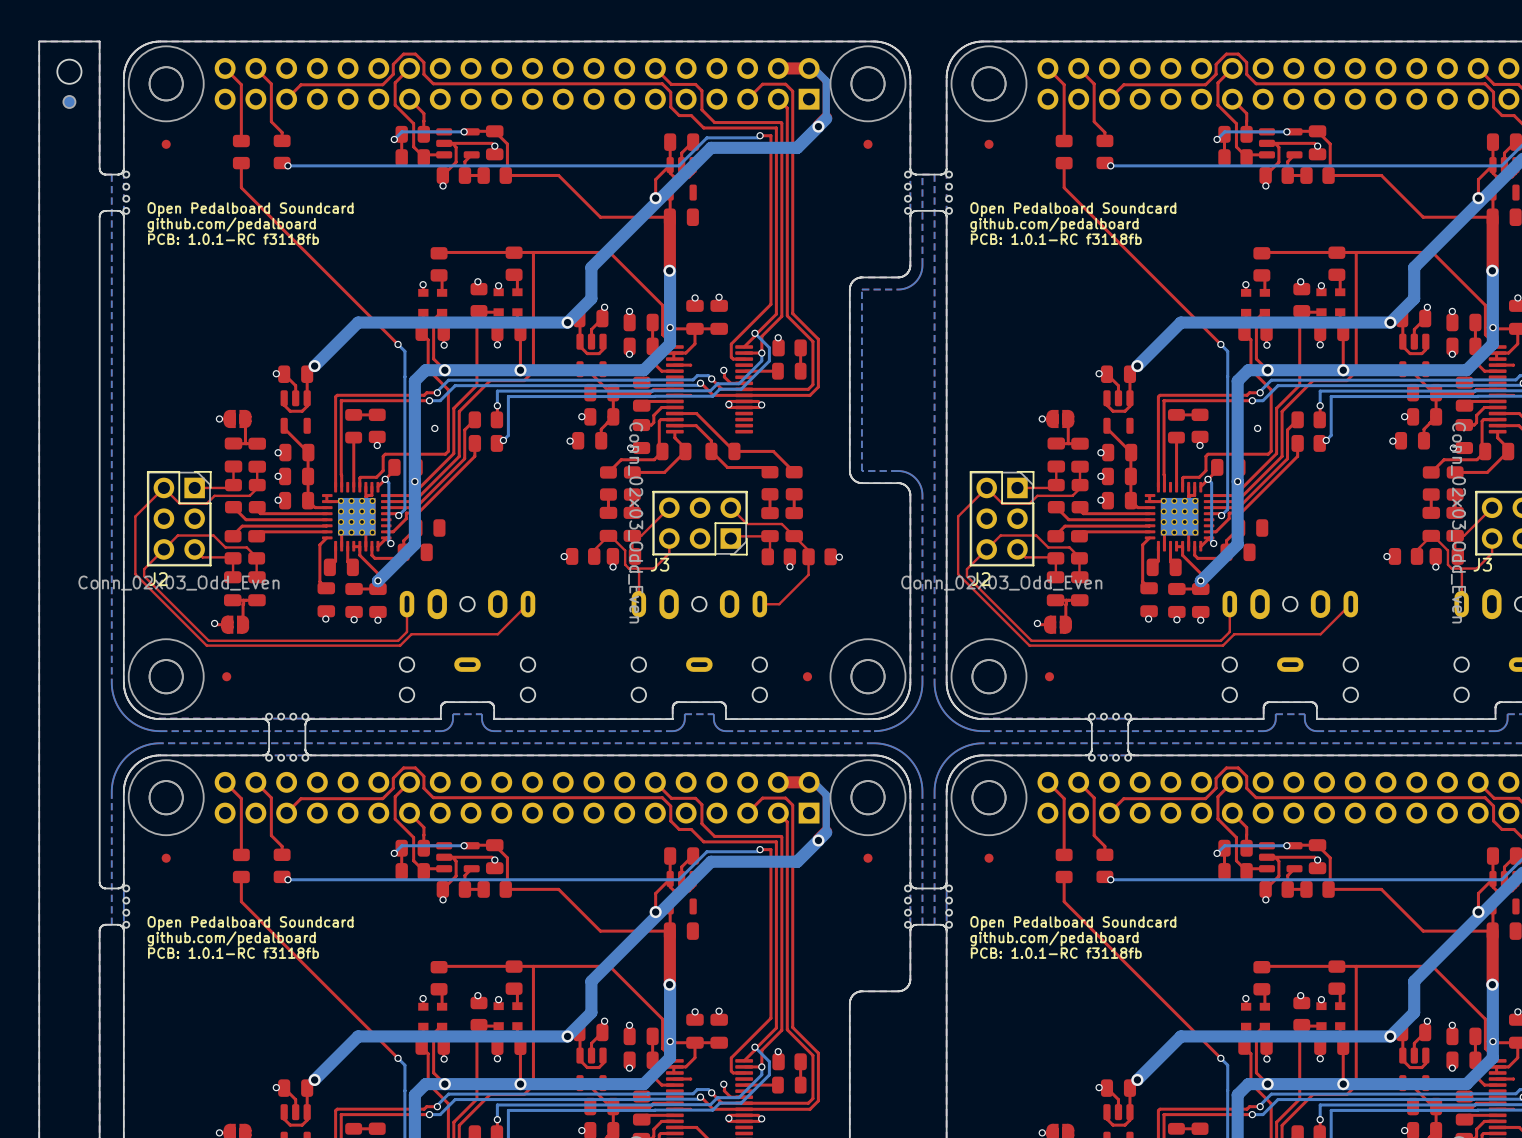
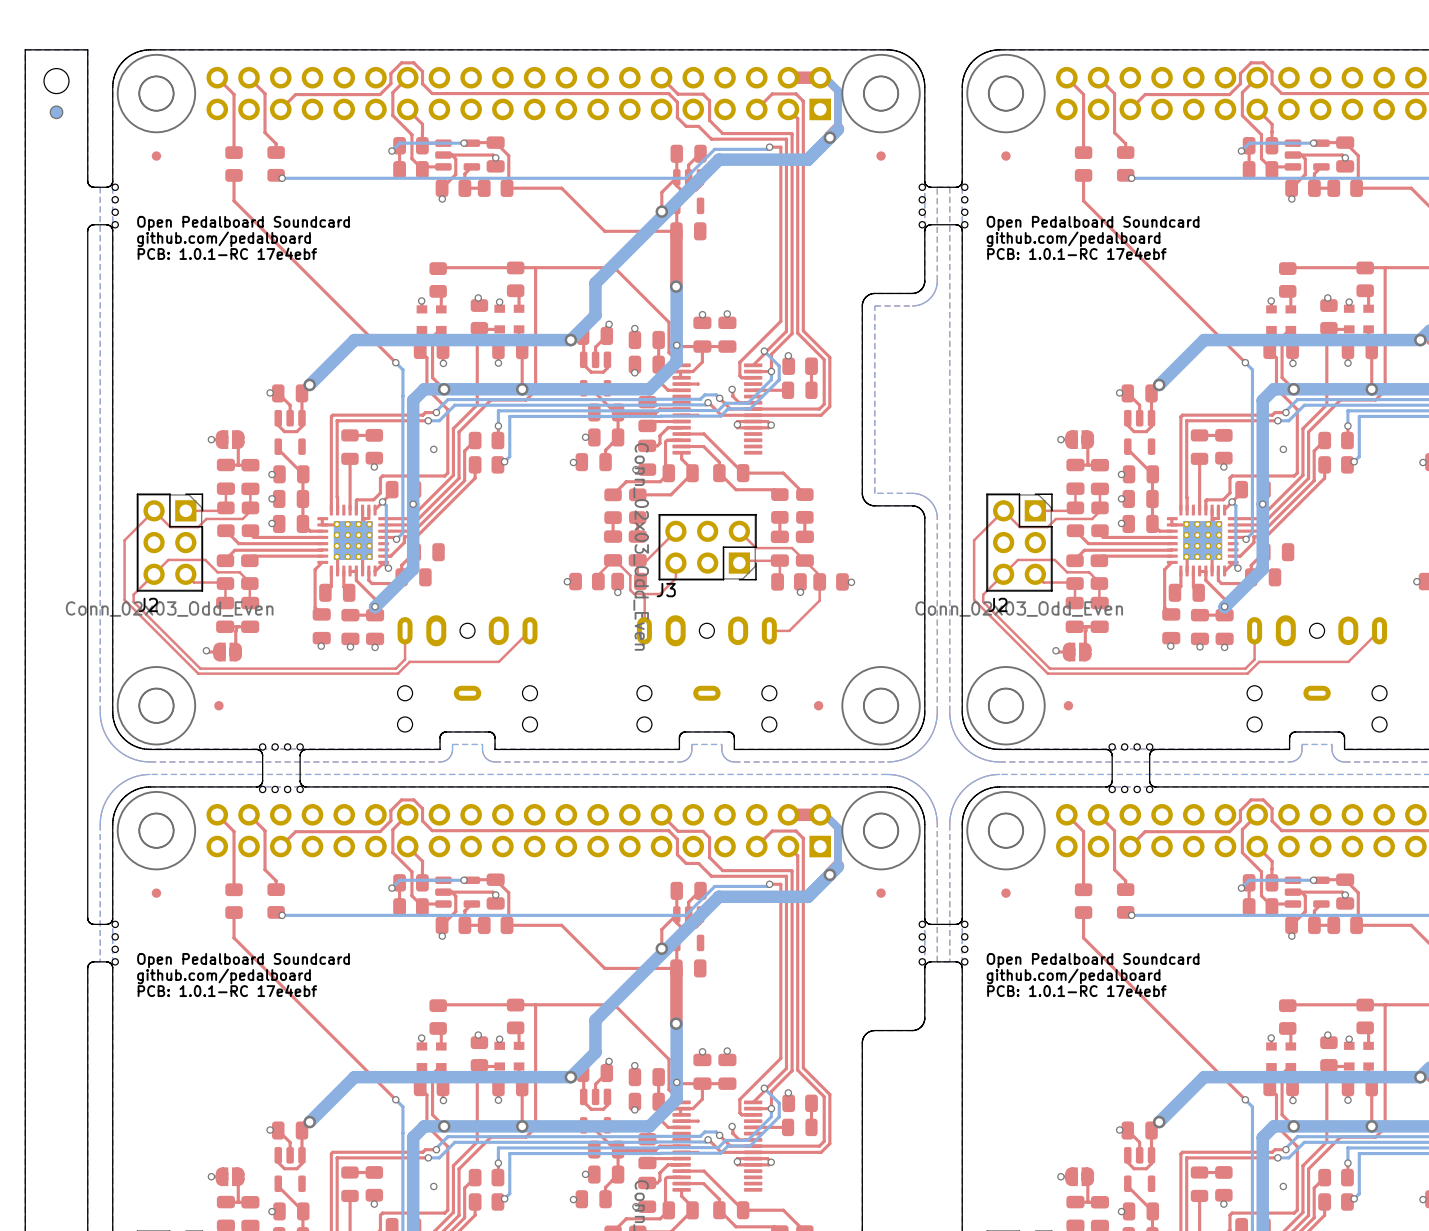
text: PCB: 1.0.1-RC f3118fb (233, 239) -> PCB: 1.0.1-RC 17e4ebf (227, 253)
text: PCB: 1.0.1-RC f3118fb (1056, 239) -> PCB: 1.0.1-RC 17e4ebf (1076, 253)
text: PCB: 1.0.1-RC f3118fb (233, 953) -> PCB: 1.0.1-RC 17e4ebf (227, 990)
text: PCB: 1.0.1-RC f3118fb (1056, 953) -> PCB: 1.0.1-RC 17e4ebf (1076, 990)

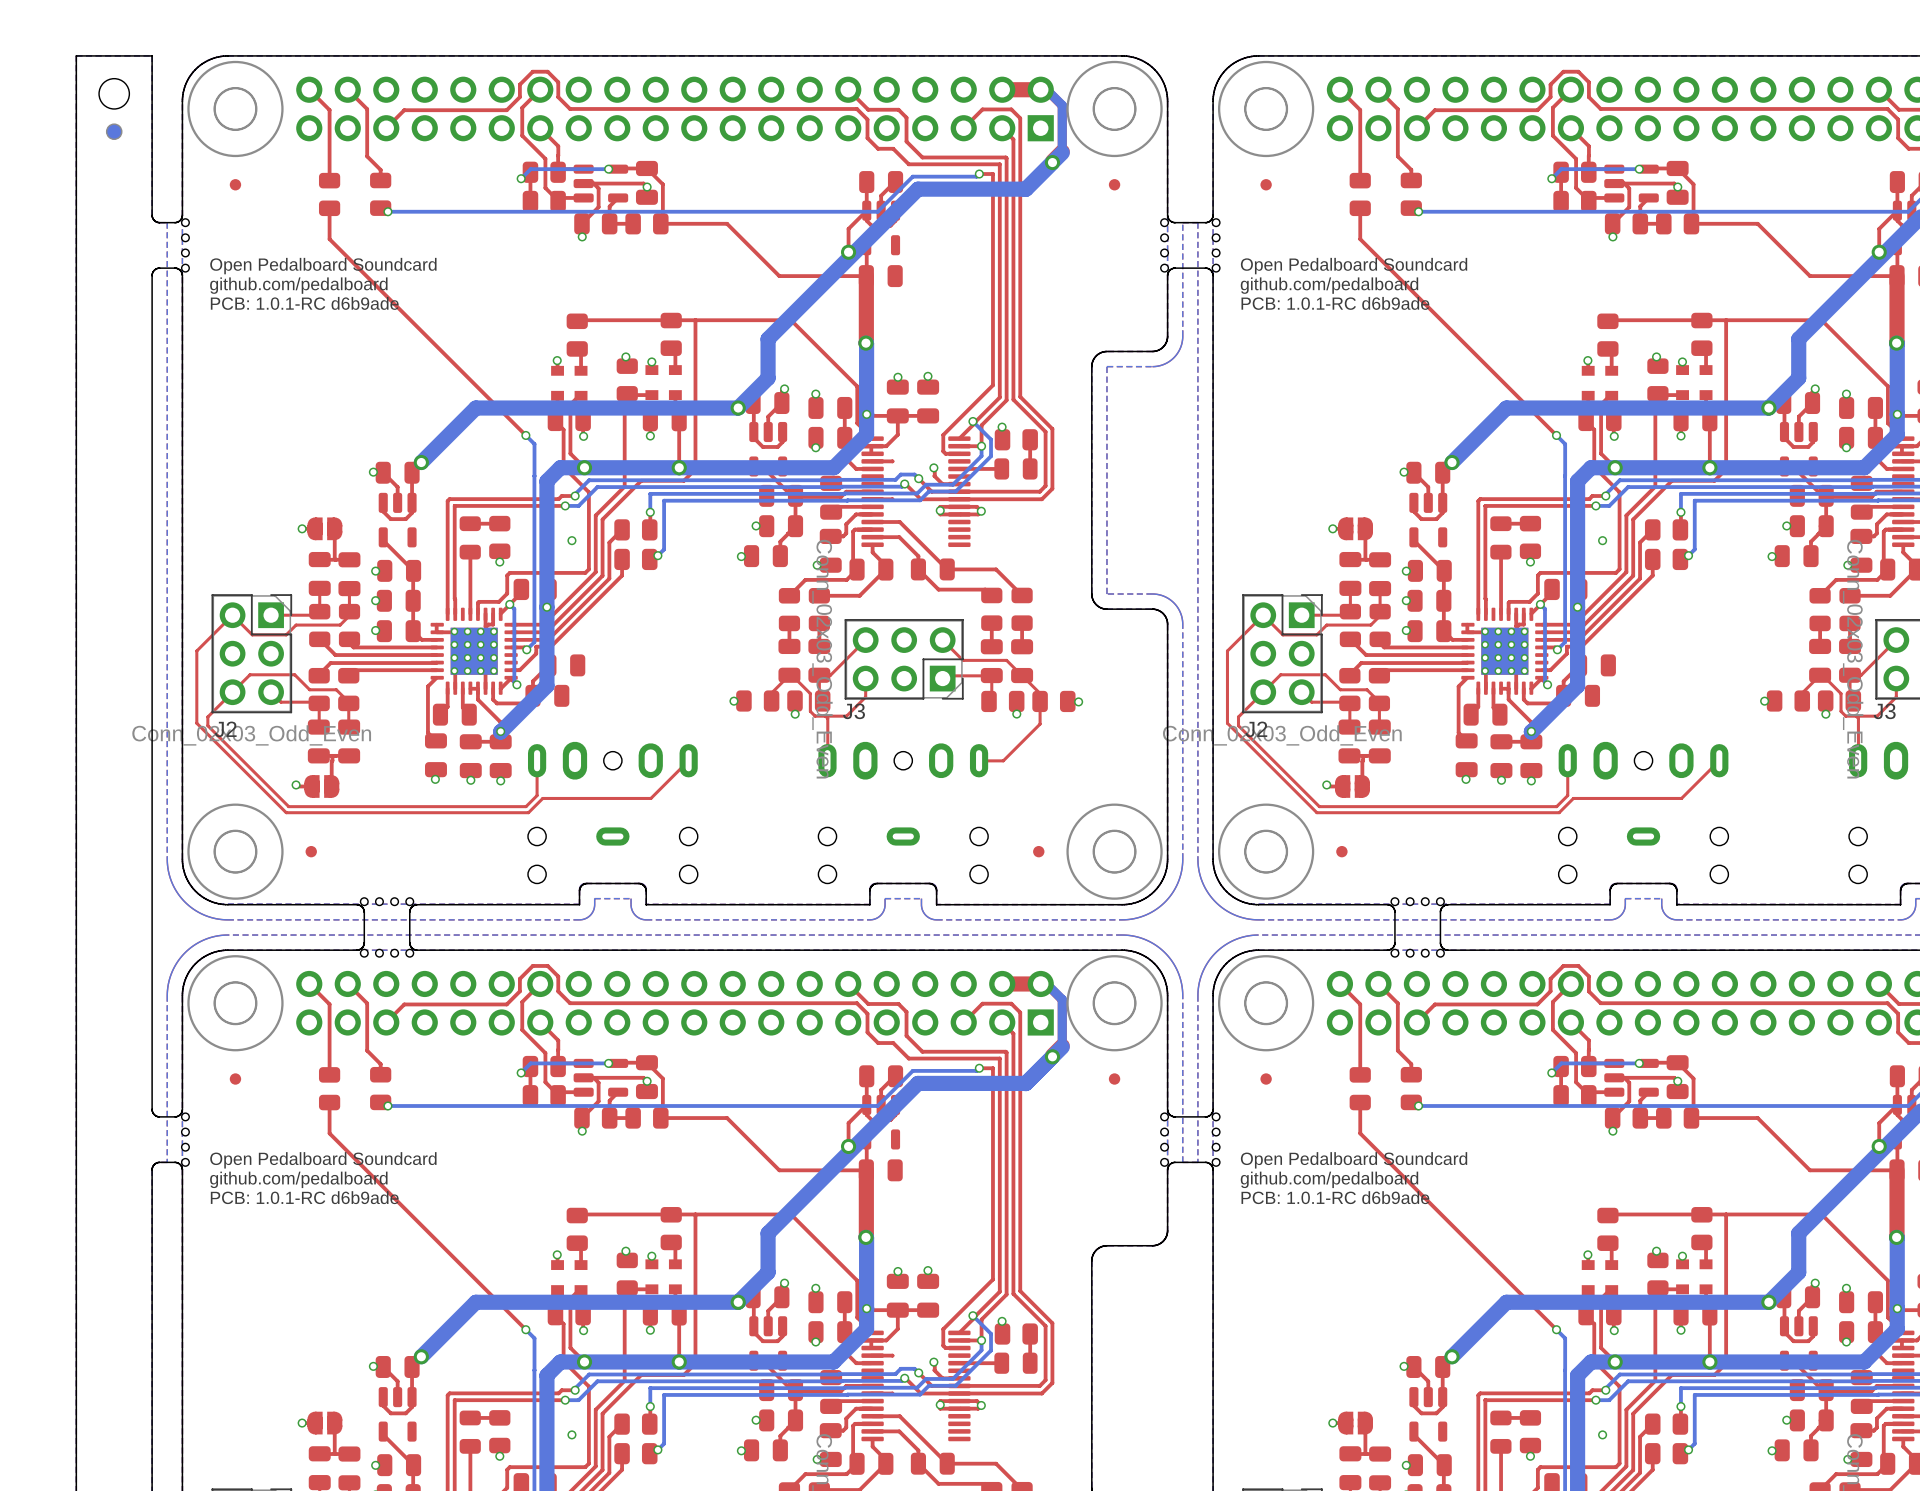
text: PCB: 1.0.1-RC 17e4ebf (227, 253) -> PCB: 1.0.1-RC d6b9ade (304, 303)
text: PCB: 1.0.1-RC 17e4ebf (1076, 253) -> PCB: 1.0.1-RC d6b9ade (1335, 303)
text: PCB: 1.0.1-RC 17e4ebf (227, 990) -> PCB: 1.0.1-RC d6b9ade (304, 1197)
text: PCB: 1.0.1-RC 17e4ebf (1076, 990) -> PCB: 1.0.1-RC d6b9ade (1335, 1197)

